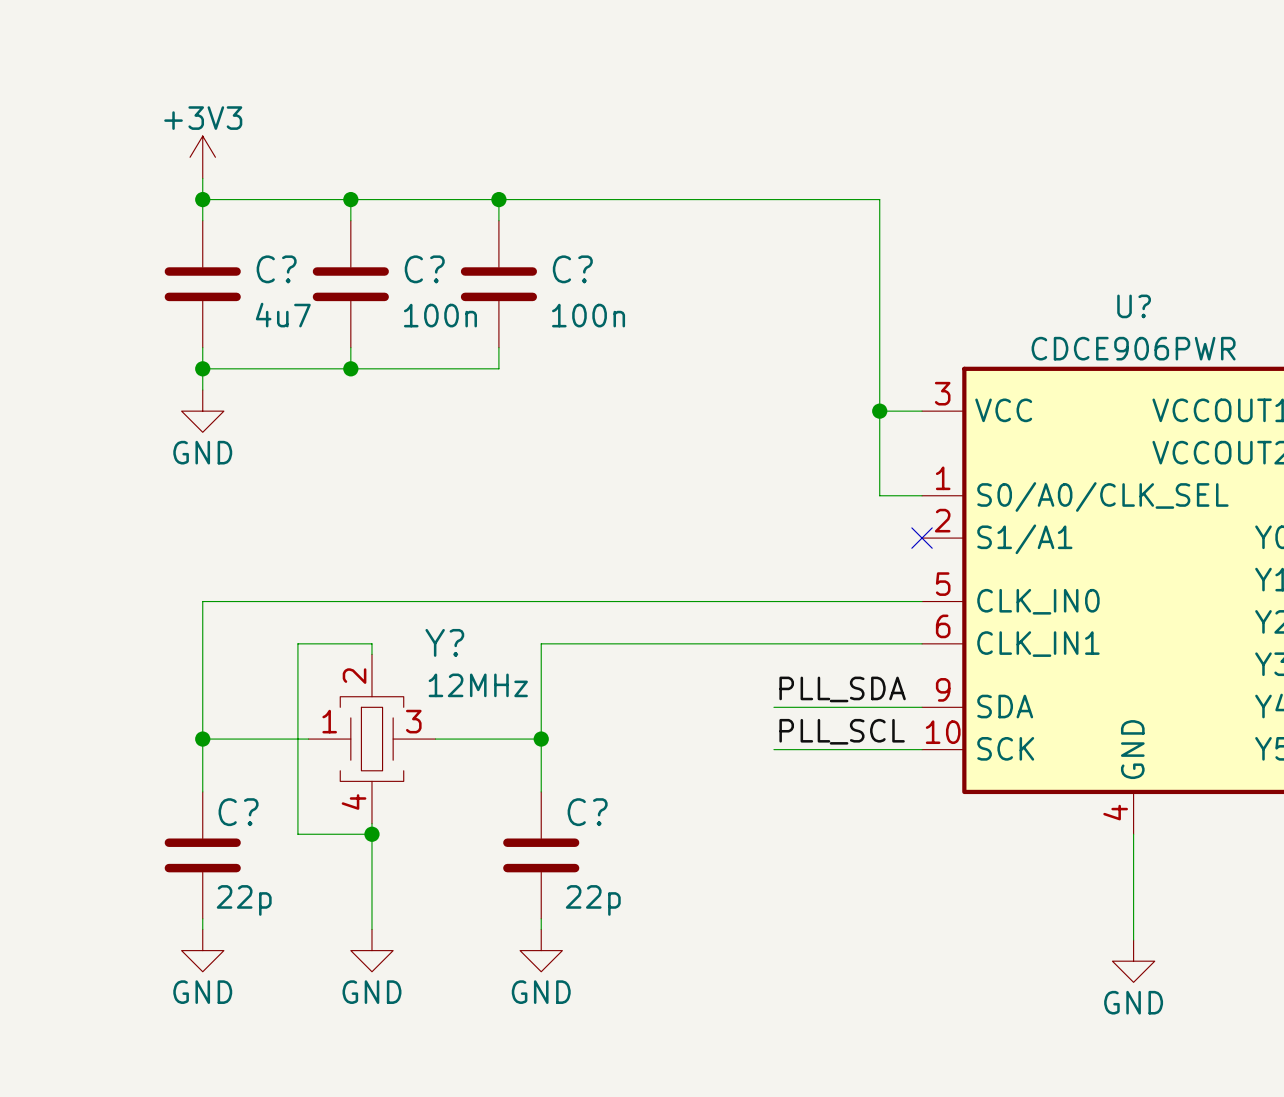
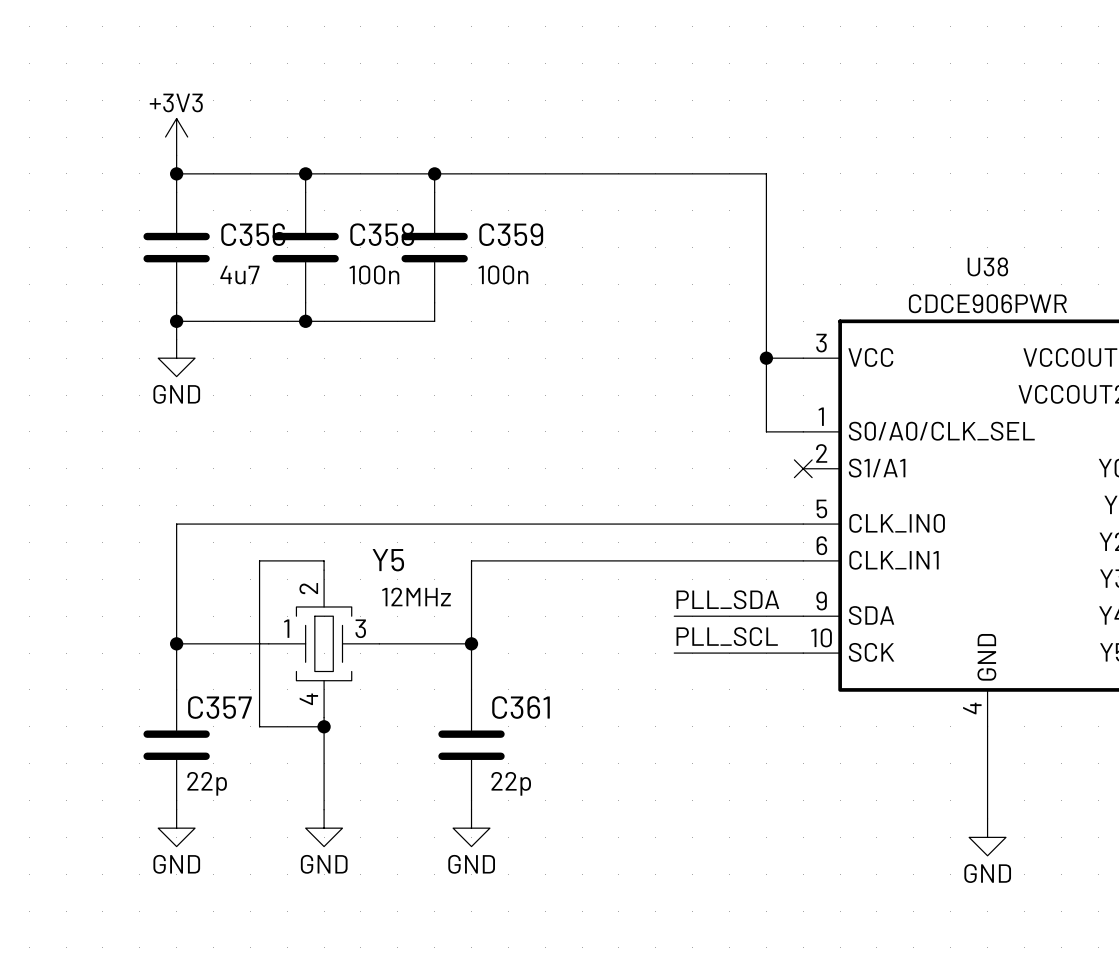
C? name: C? (276, 269) -> C356 (253, 234)
C? name: C? (424, 269) -> C358 (382, 234)
C? name: C? (572, 269) -> C359 (511, 234)
U? name: U? (1134, 306) -> U38 (987, 266)
Y? name: Y? (444, 642) -> Y5 (388, 560)
C? name: C? (238, 812) -> C357 (219, 707)
C? name: C? (587, 812) -> C361 (521, 707)

